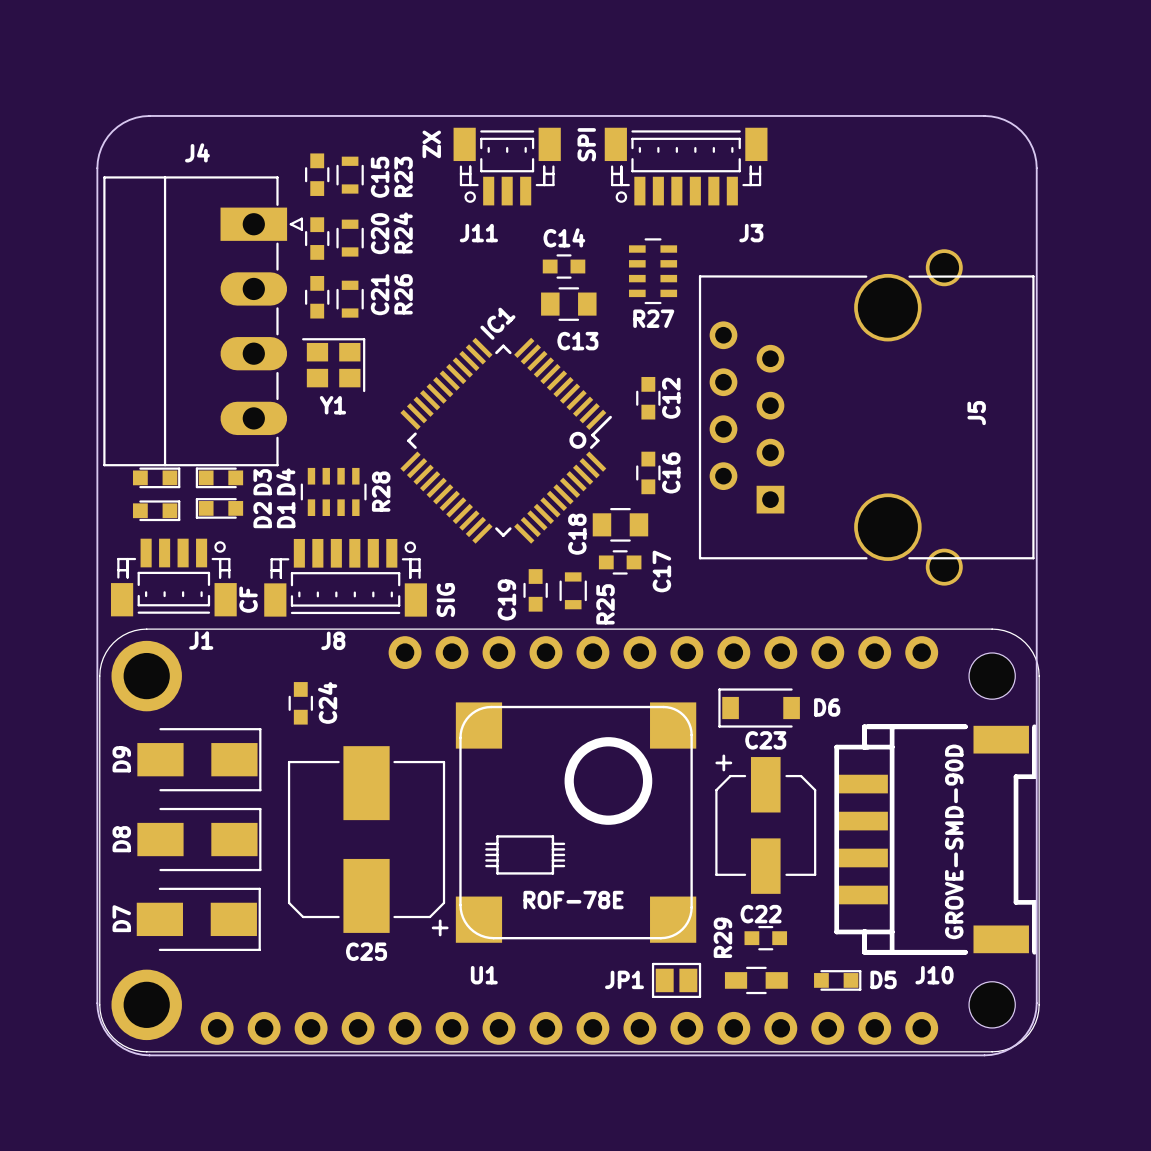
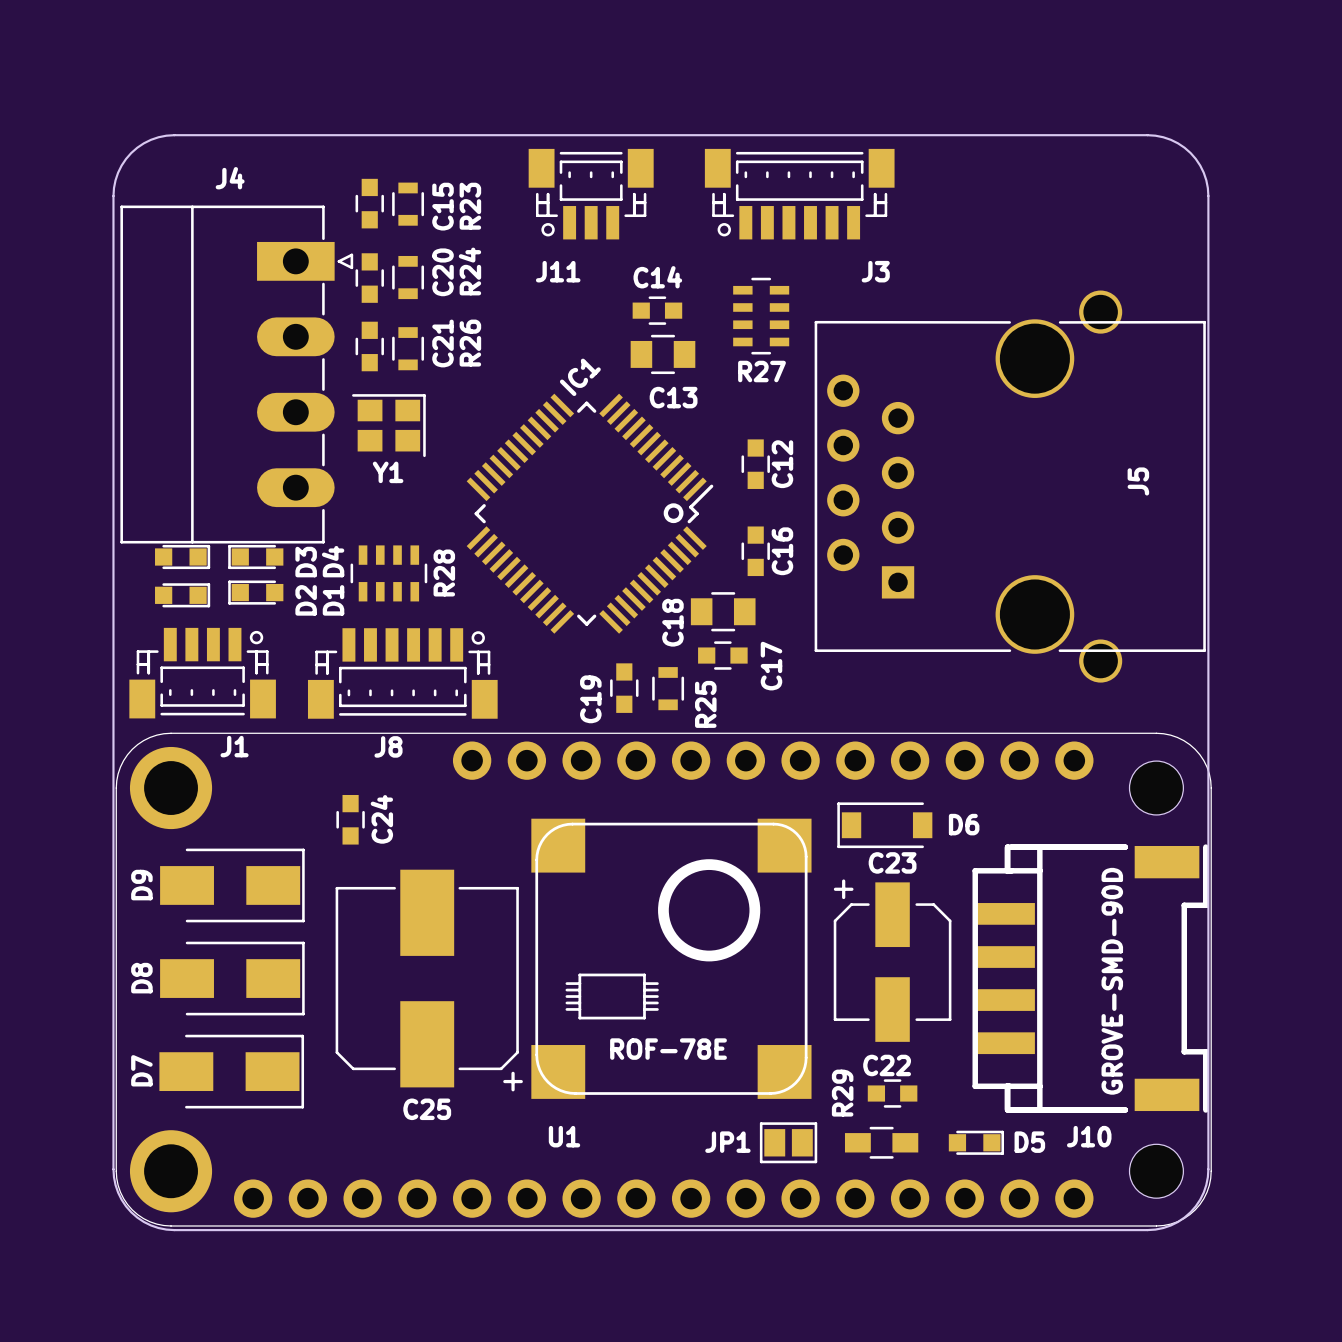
text: ZX (431, 144) -> none
text: SPI (586, 144) -> none
text: CF (248, 599) -> none
text: SIG (445, 599) -> none

